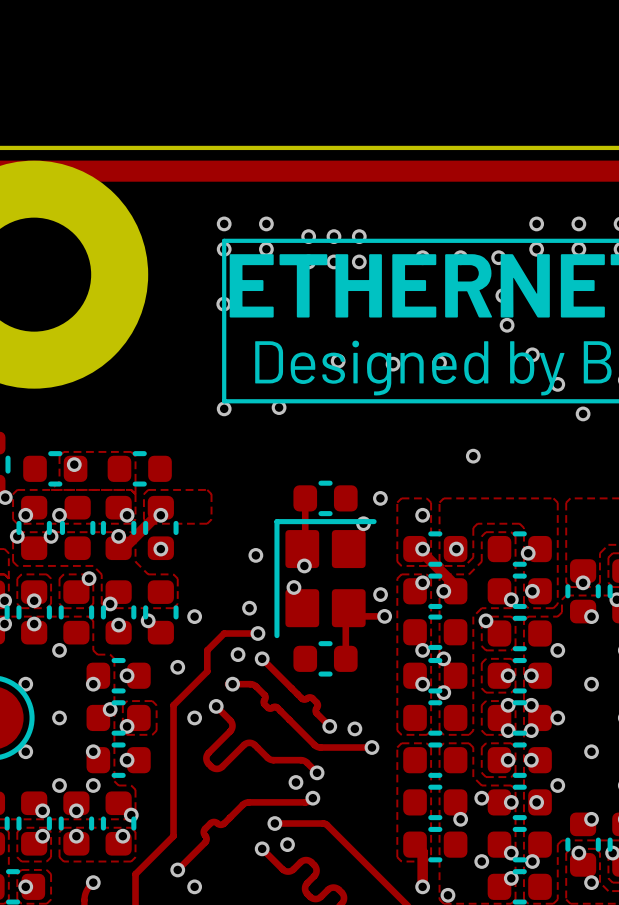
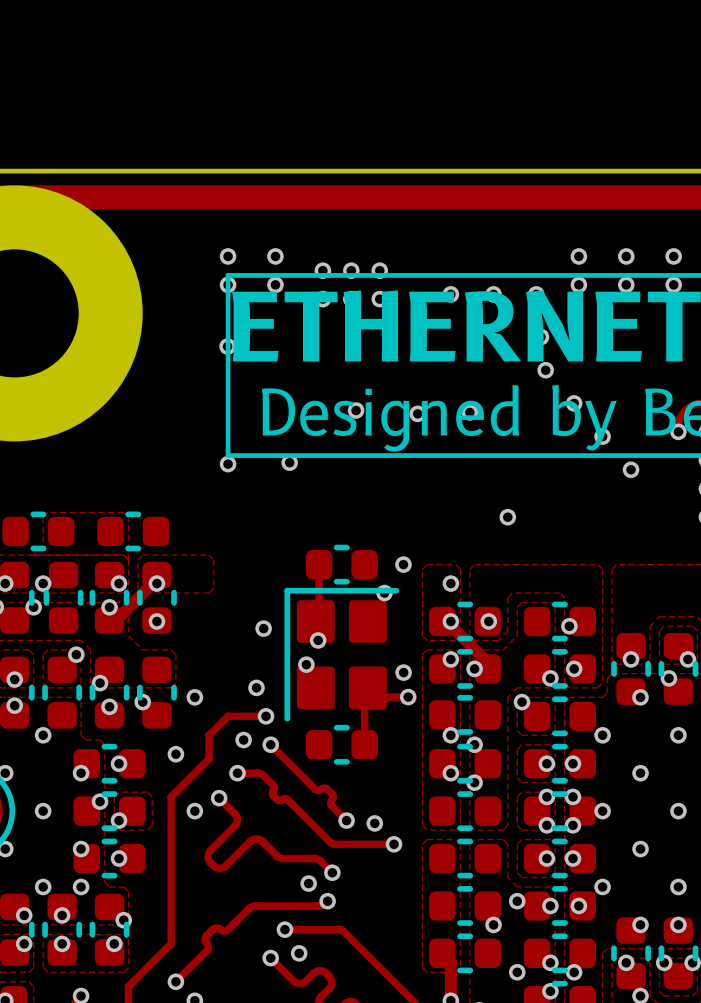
via: (74, 464) -> none

